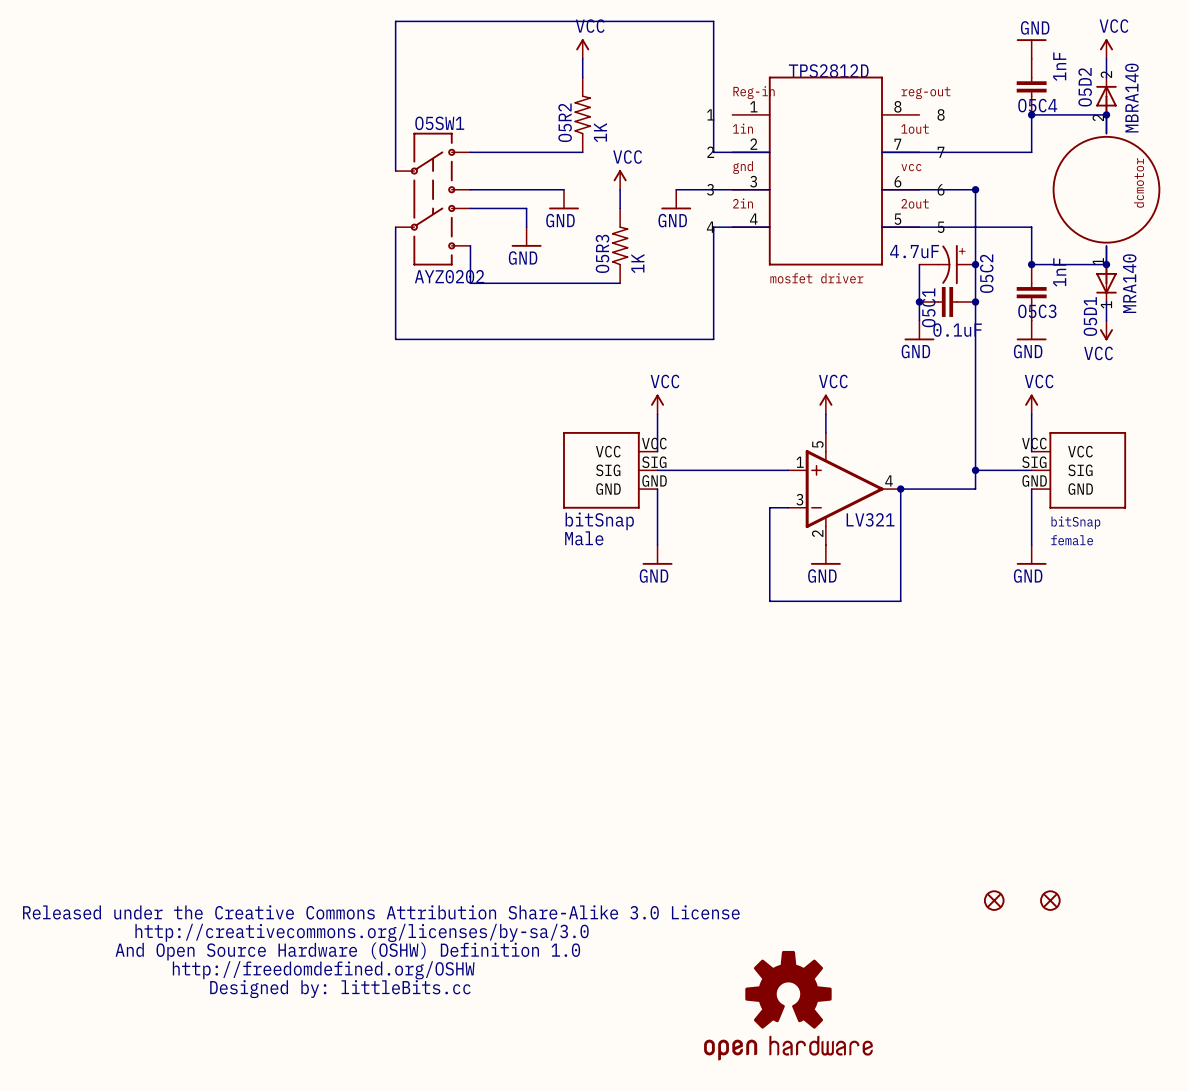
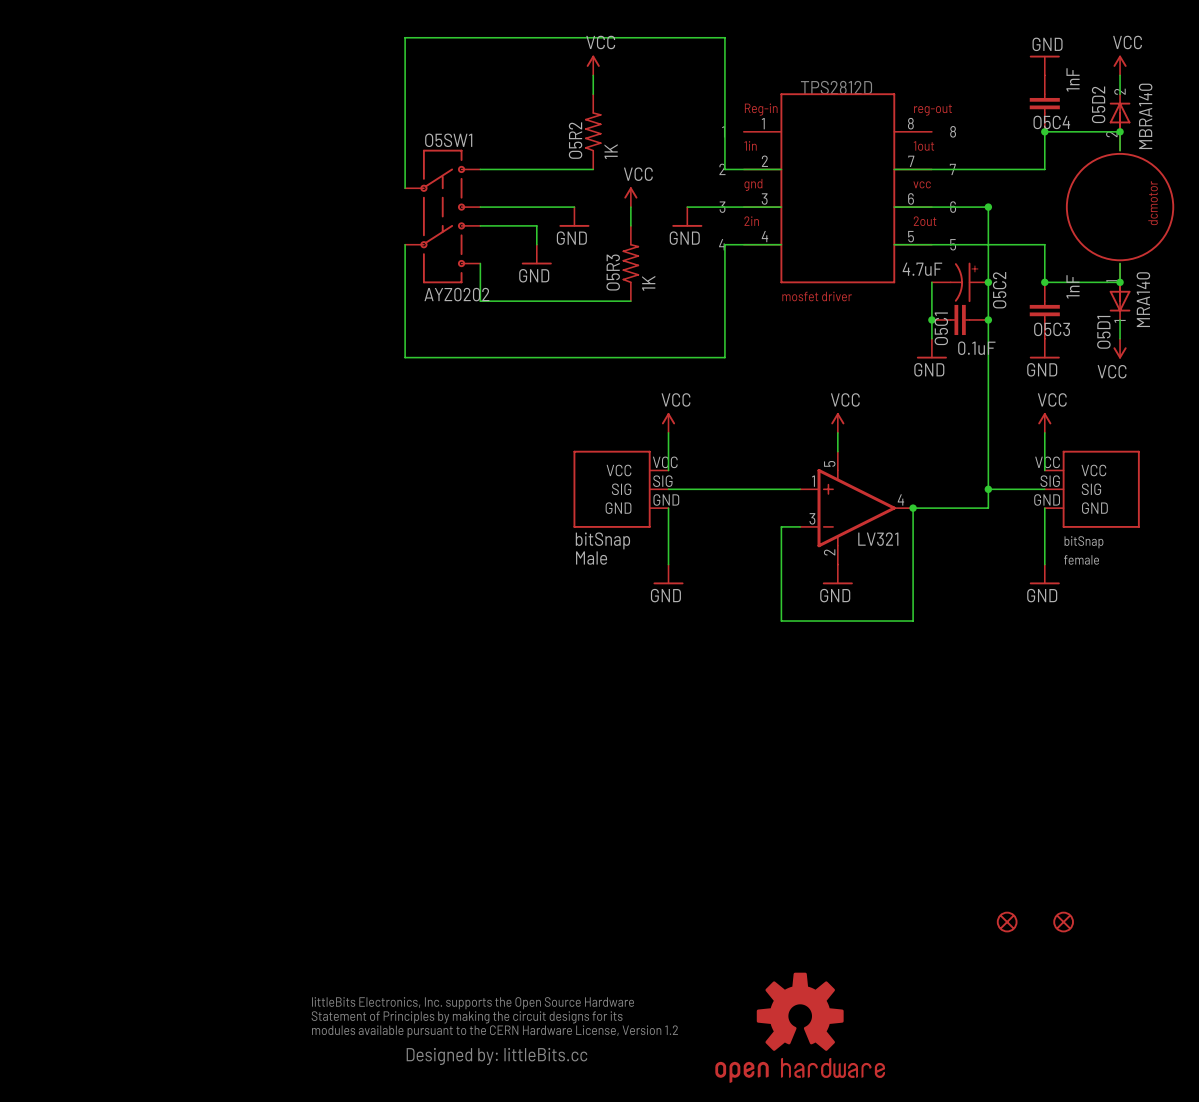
part: (381, 951) -> none
part: none -> (494, 1031)

